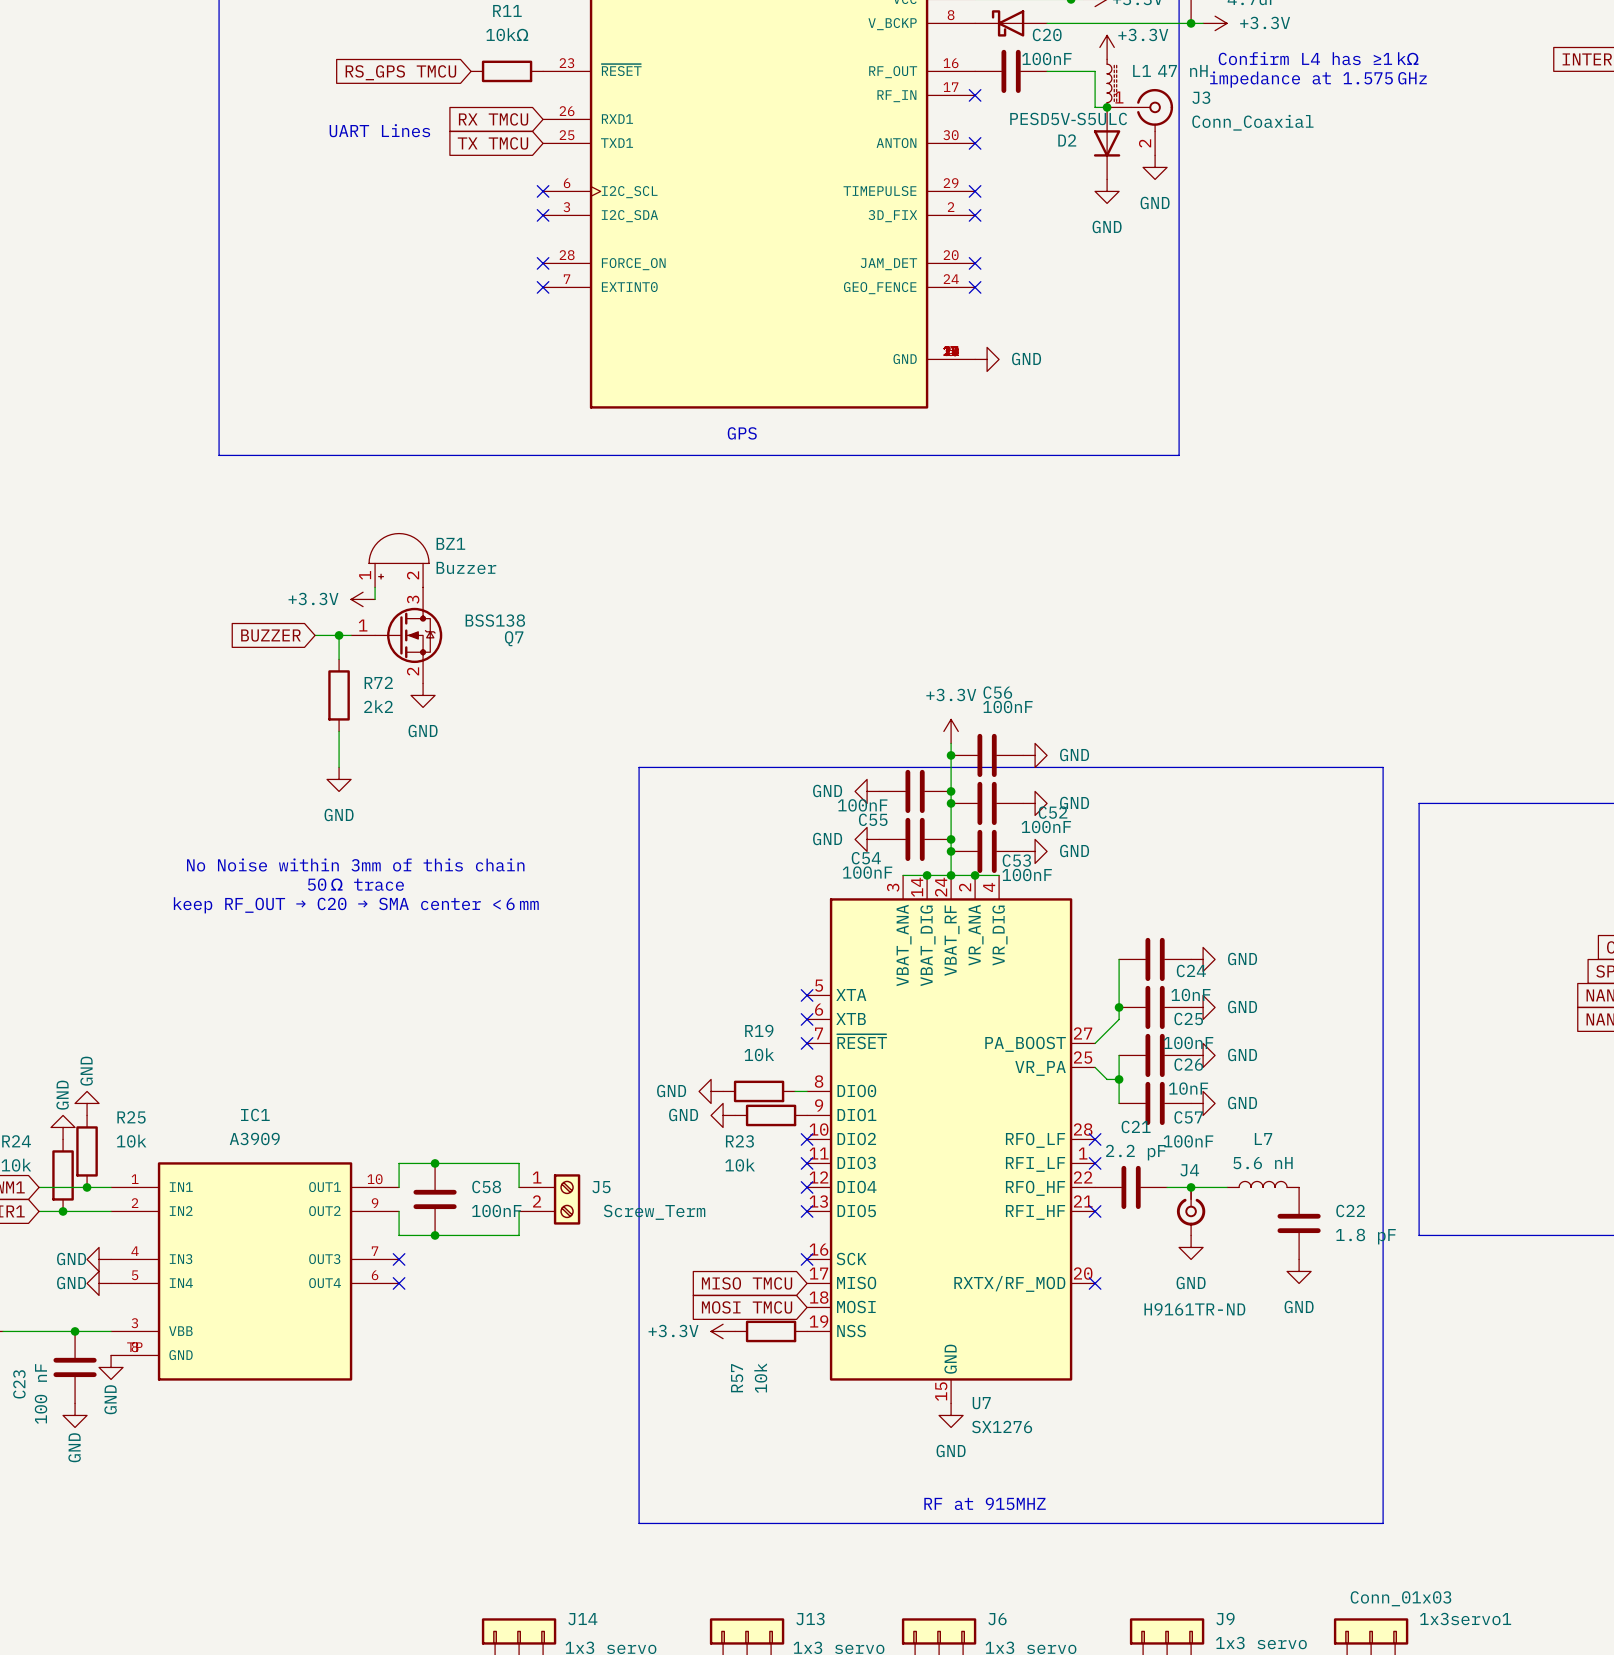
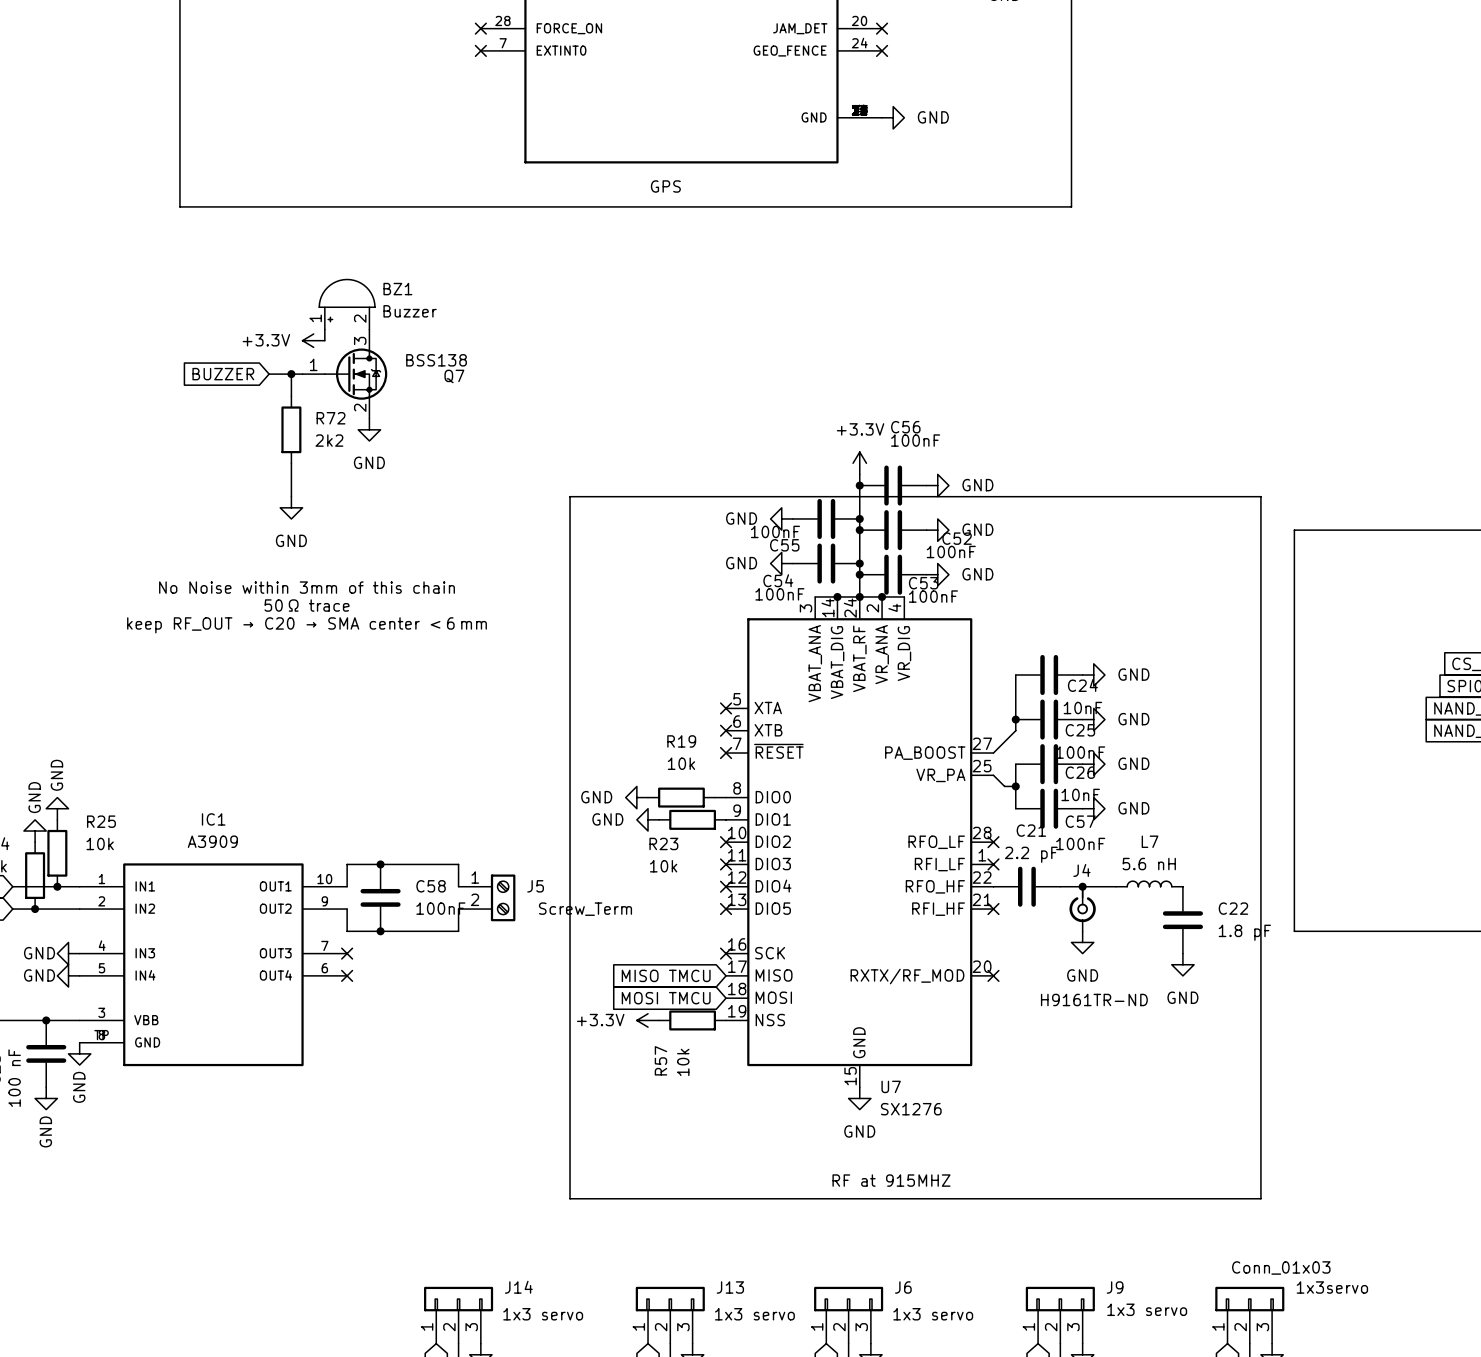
1x3servo1 name: 1x3servo1 (1465, 1619) -> 1x3servo (1332, 1287)

